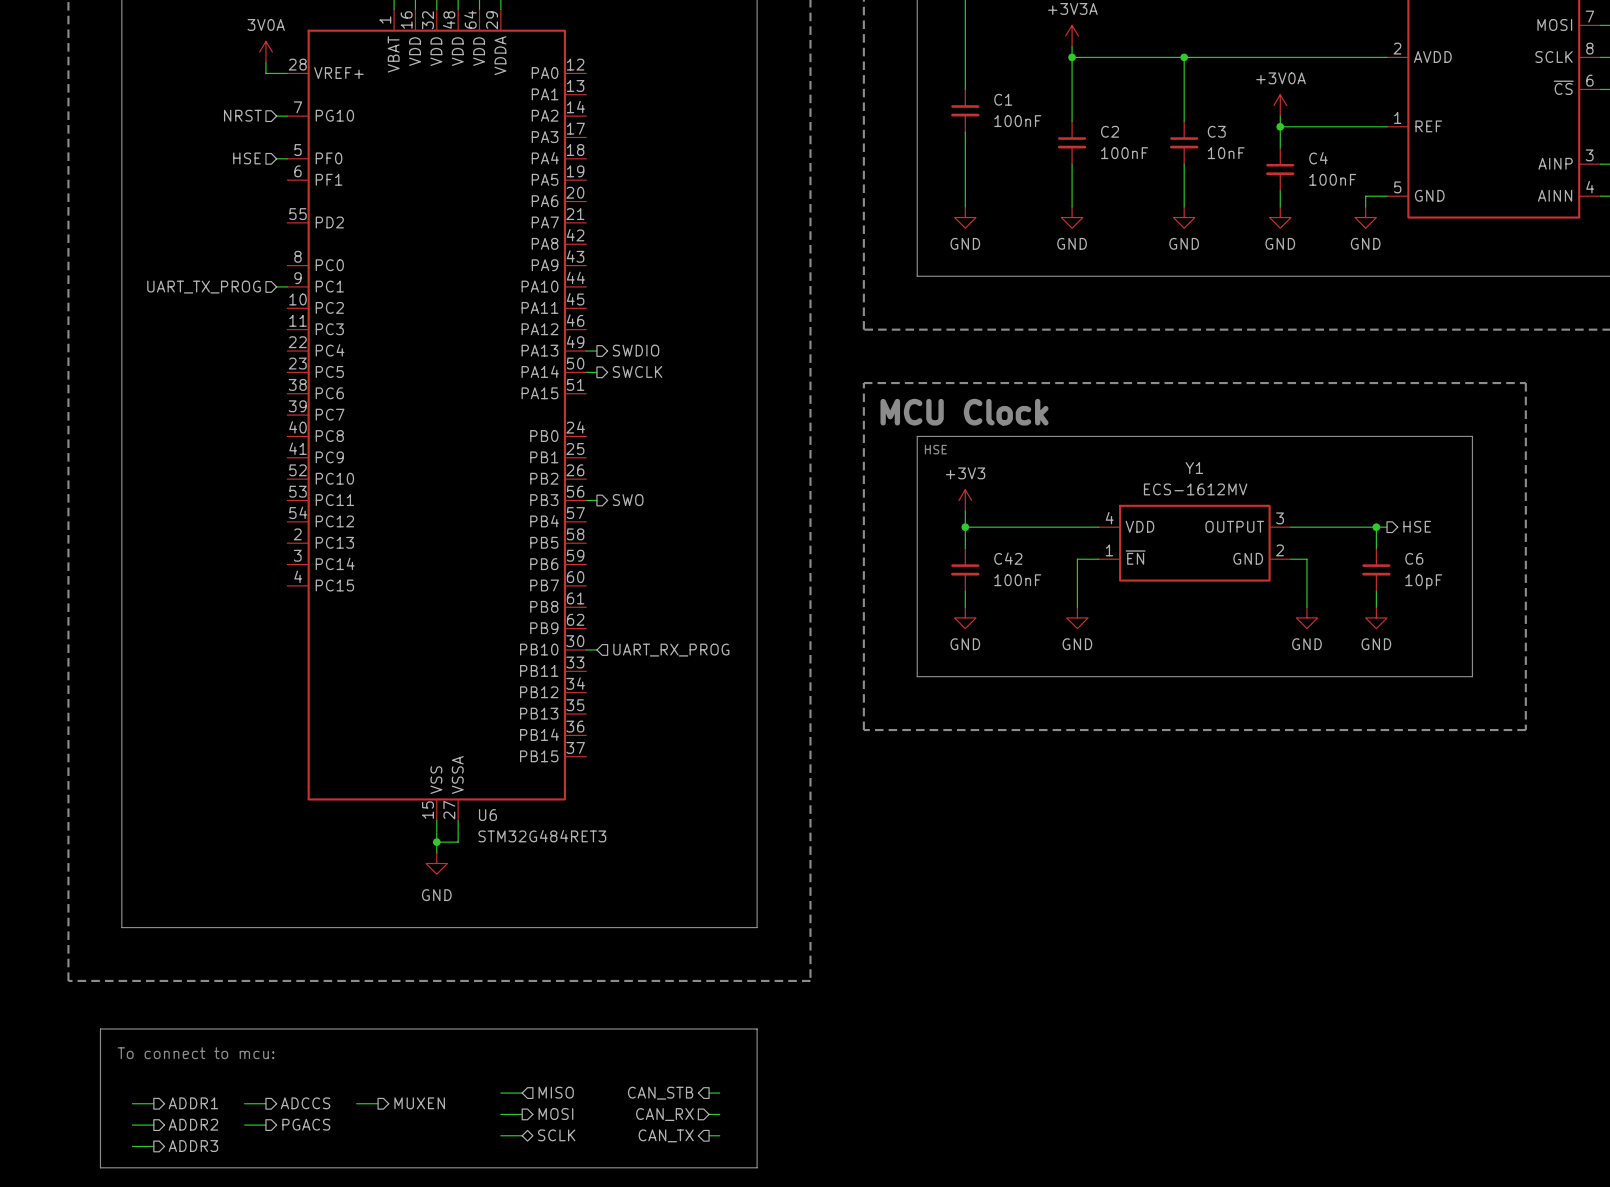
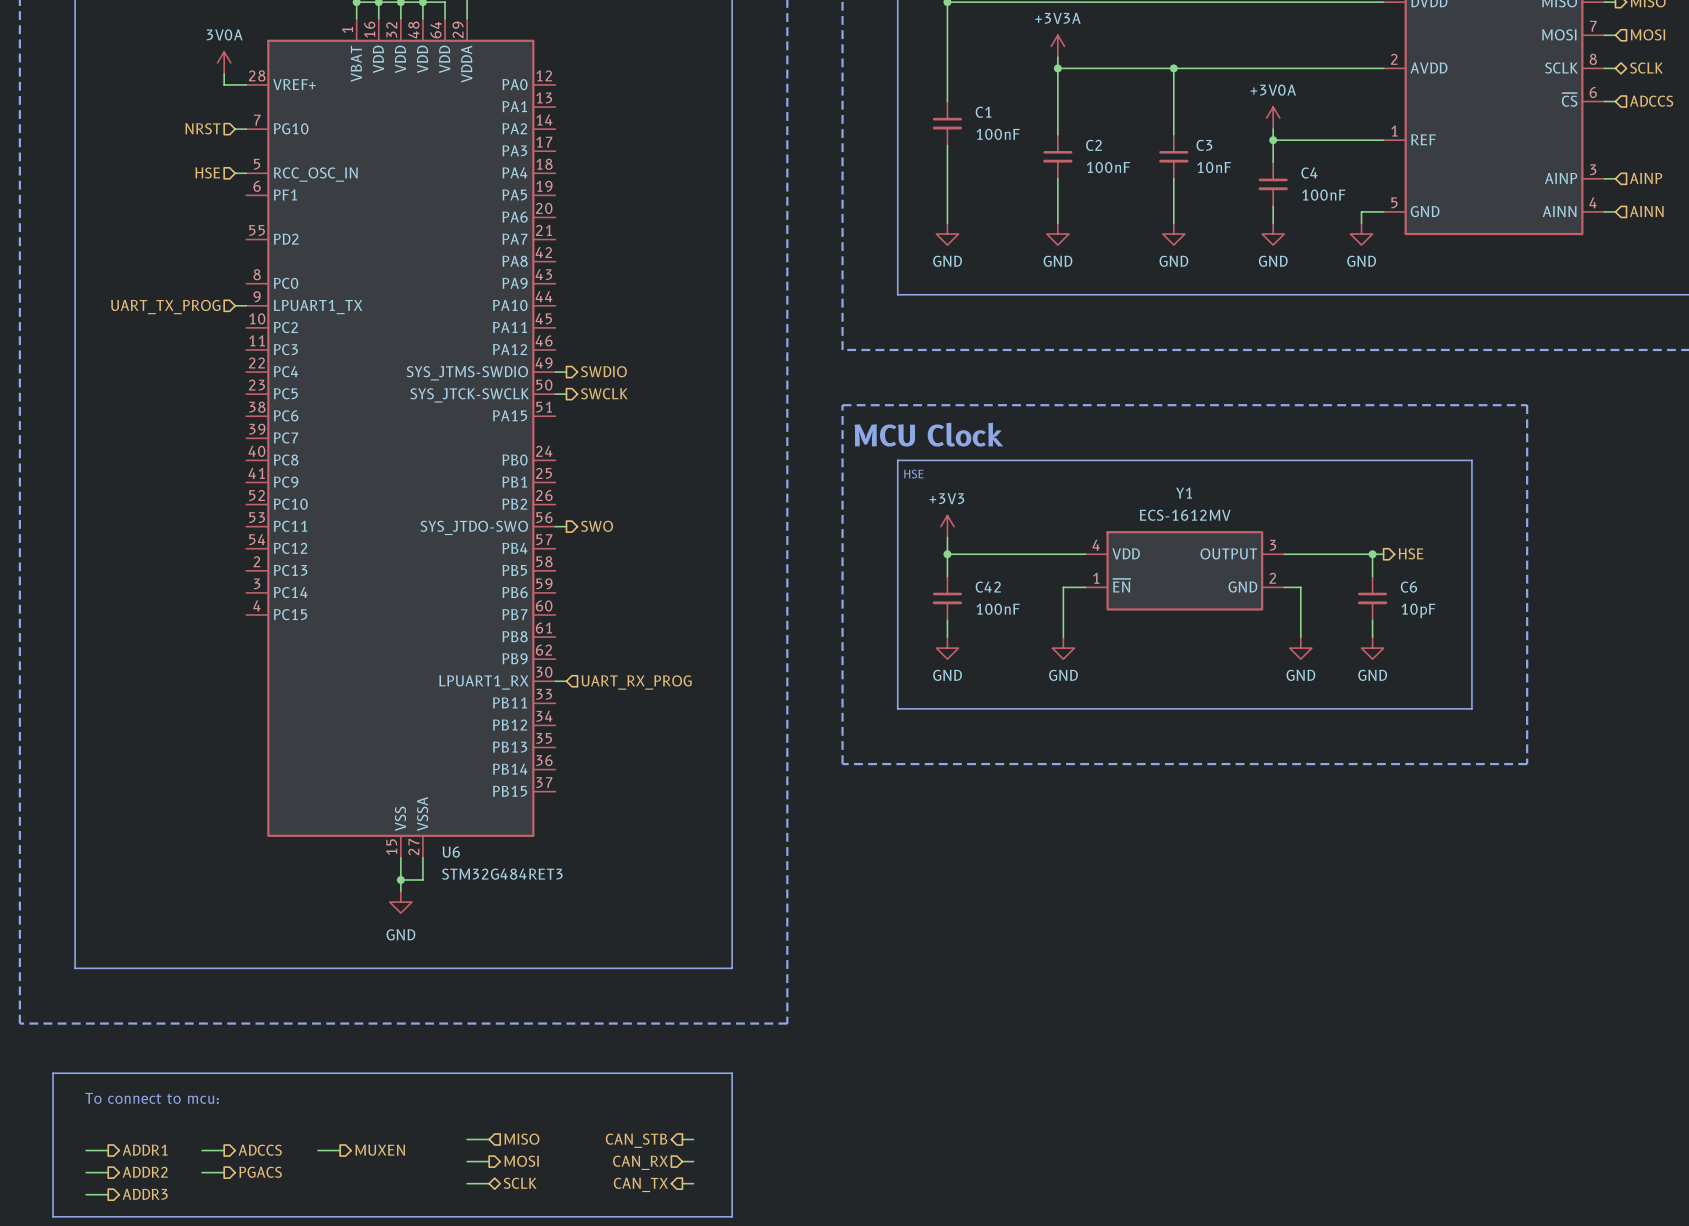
U6 pin name: PF0 (329, 158) -> RCC_OSC_IN (315, 174)
U6 pin name: PC1 (329, 286) -> LPUART1_TX (318, 307)
U6 pin name: PA13 (539, 350) -> SYS_JTMS-SWDIO (467, 373)
U6 pin name: PA14 (540, 371) -> SYS_JTCK-SWCLK (469, 395)
U6 pin name: PB3 (544, 500) -> SYS_JTDO-SWO (474, 527)
U6 pin name: PB10 (539, 649) -> LPUART1_RX (483, 682)

